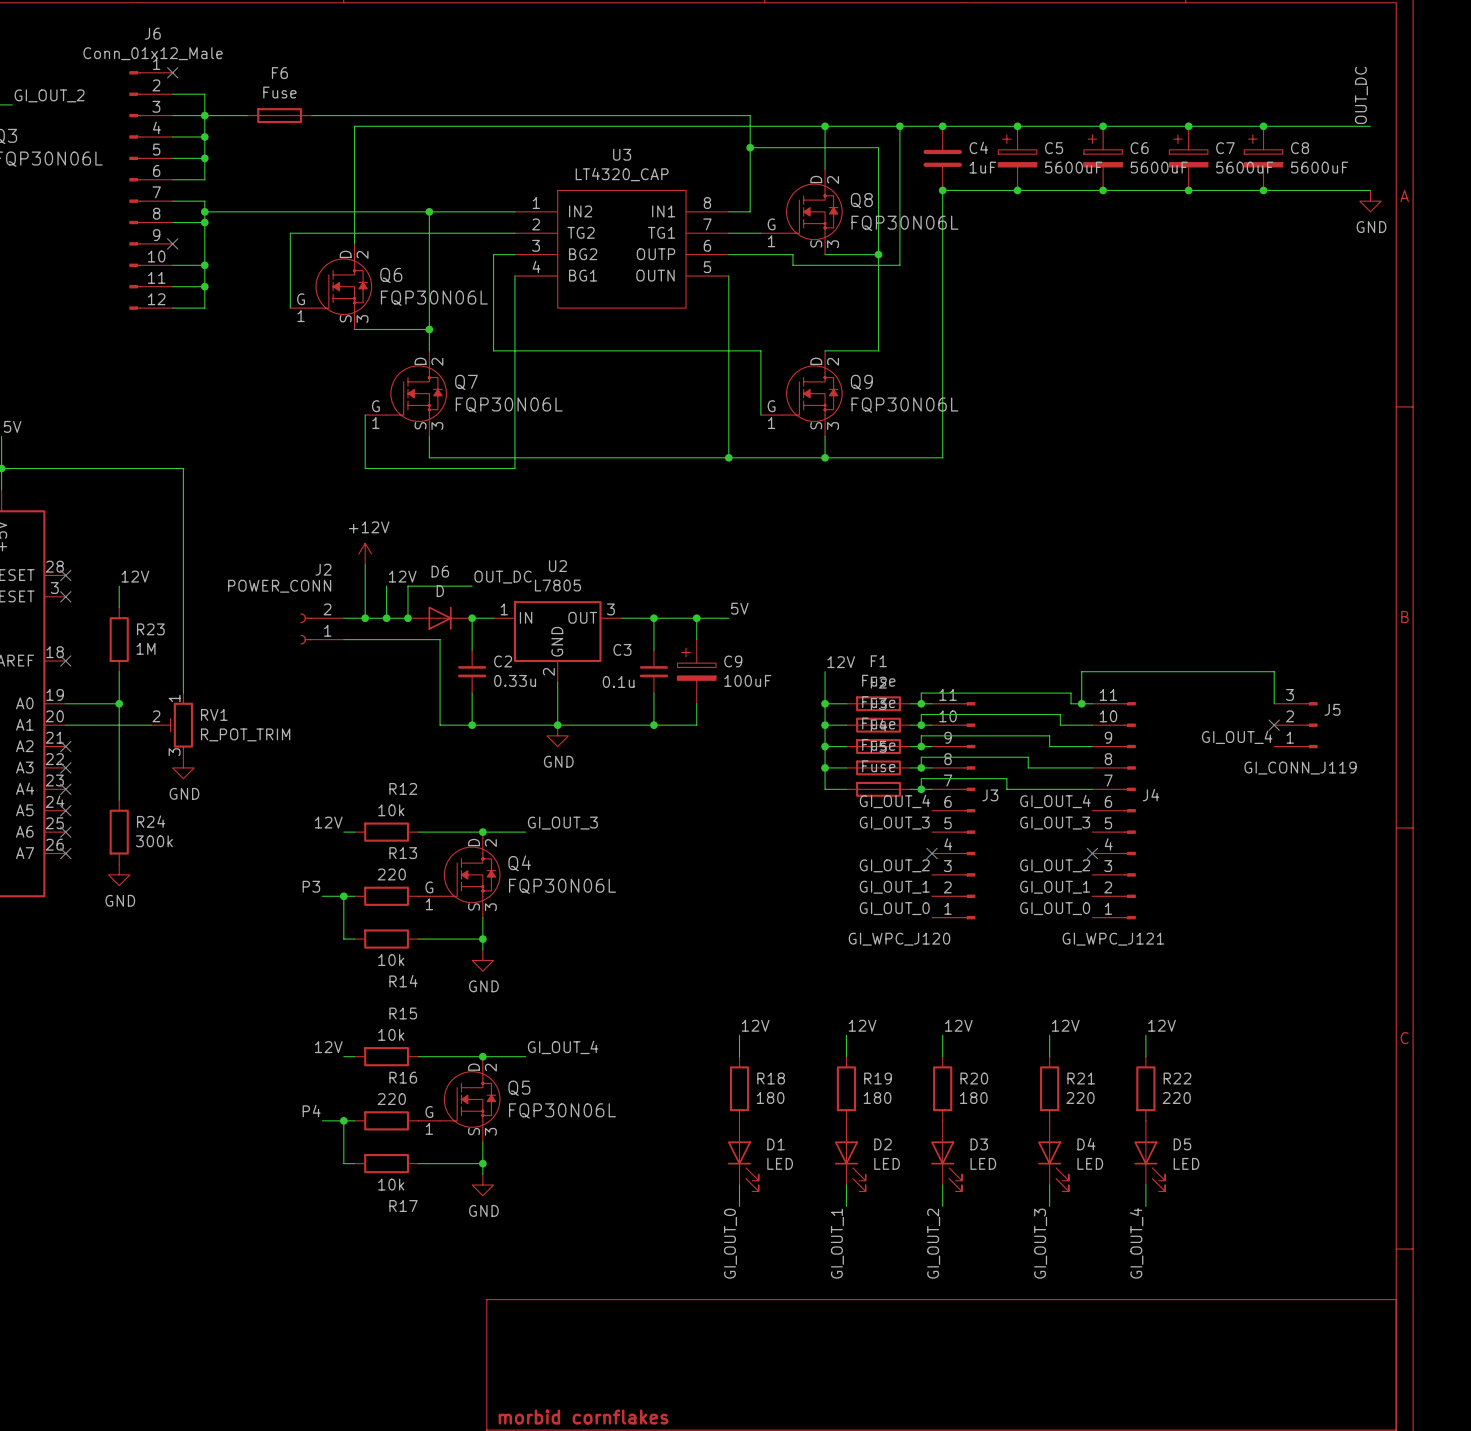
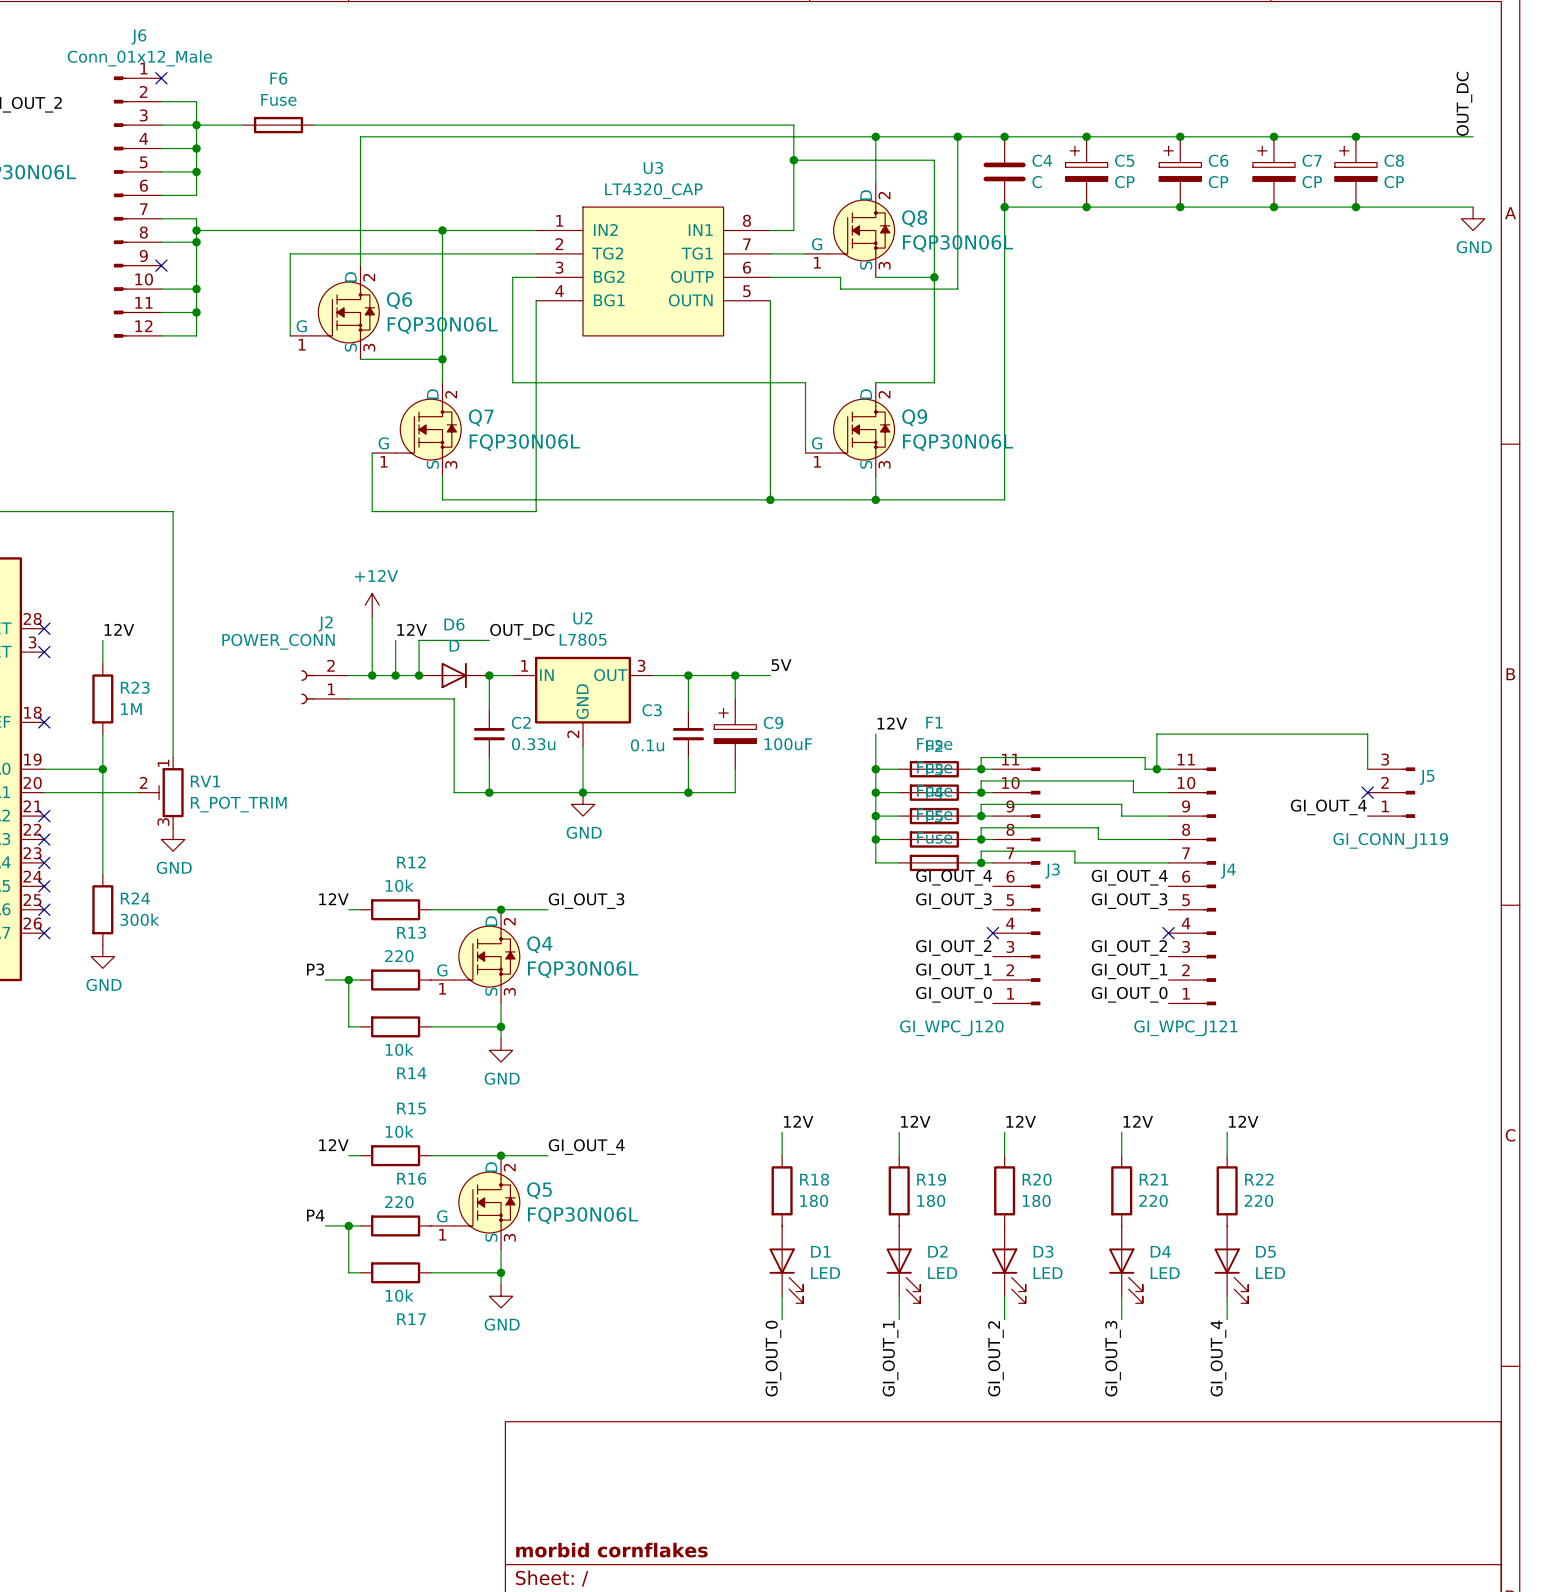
C4 value: 1uF (982, 167) -> C (1037, 182)
C5 value: 5600uF (1073, 167) -> CP (1124, 182)
C6 value: 5600uF (1159, 167) -> CP (1218, 182)
C7 value: 5600uF (1244, 167) -> CP (1312, 182)
C8 value: 5600uF (1319, 167) -> CP (1394, 182)

